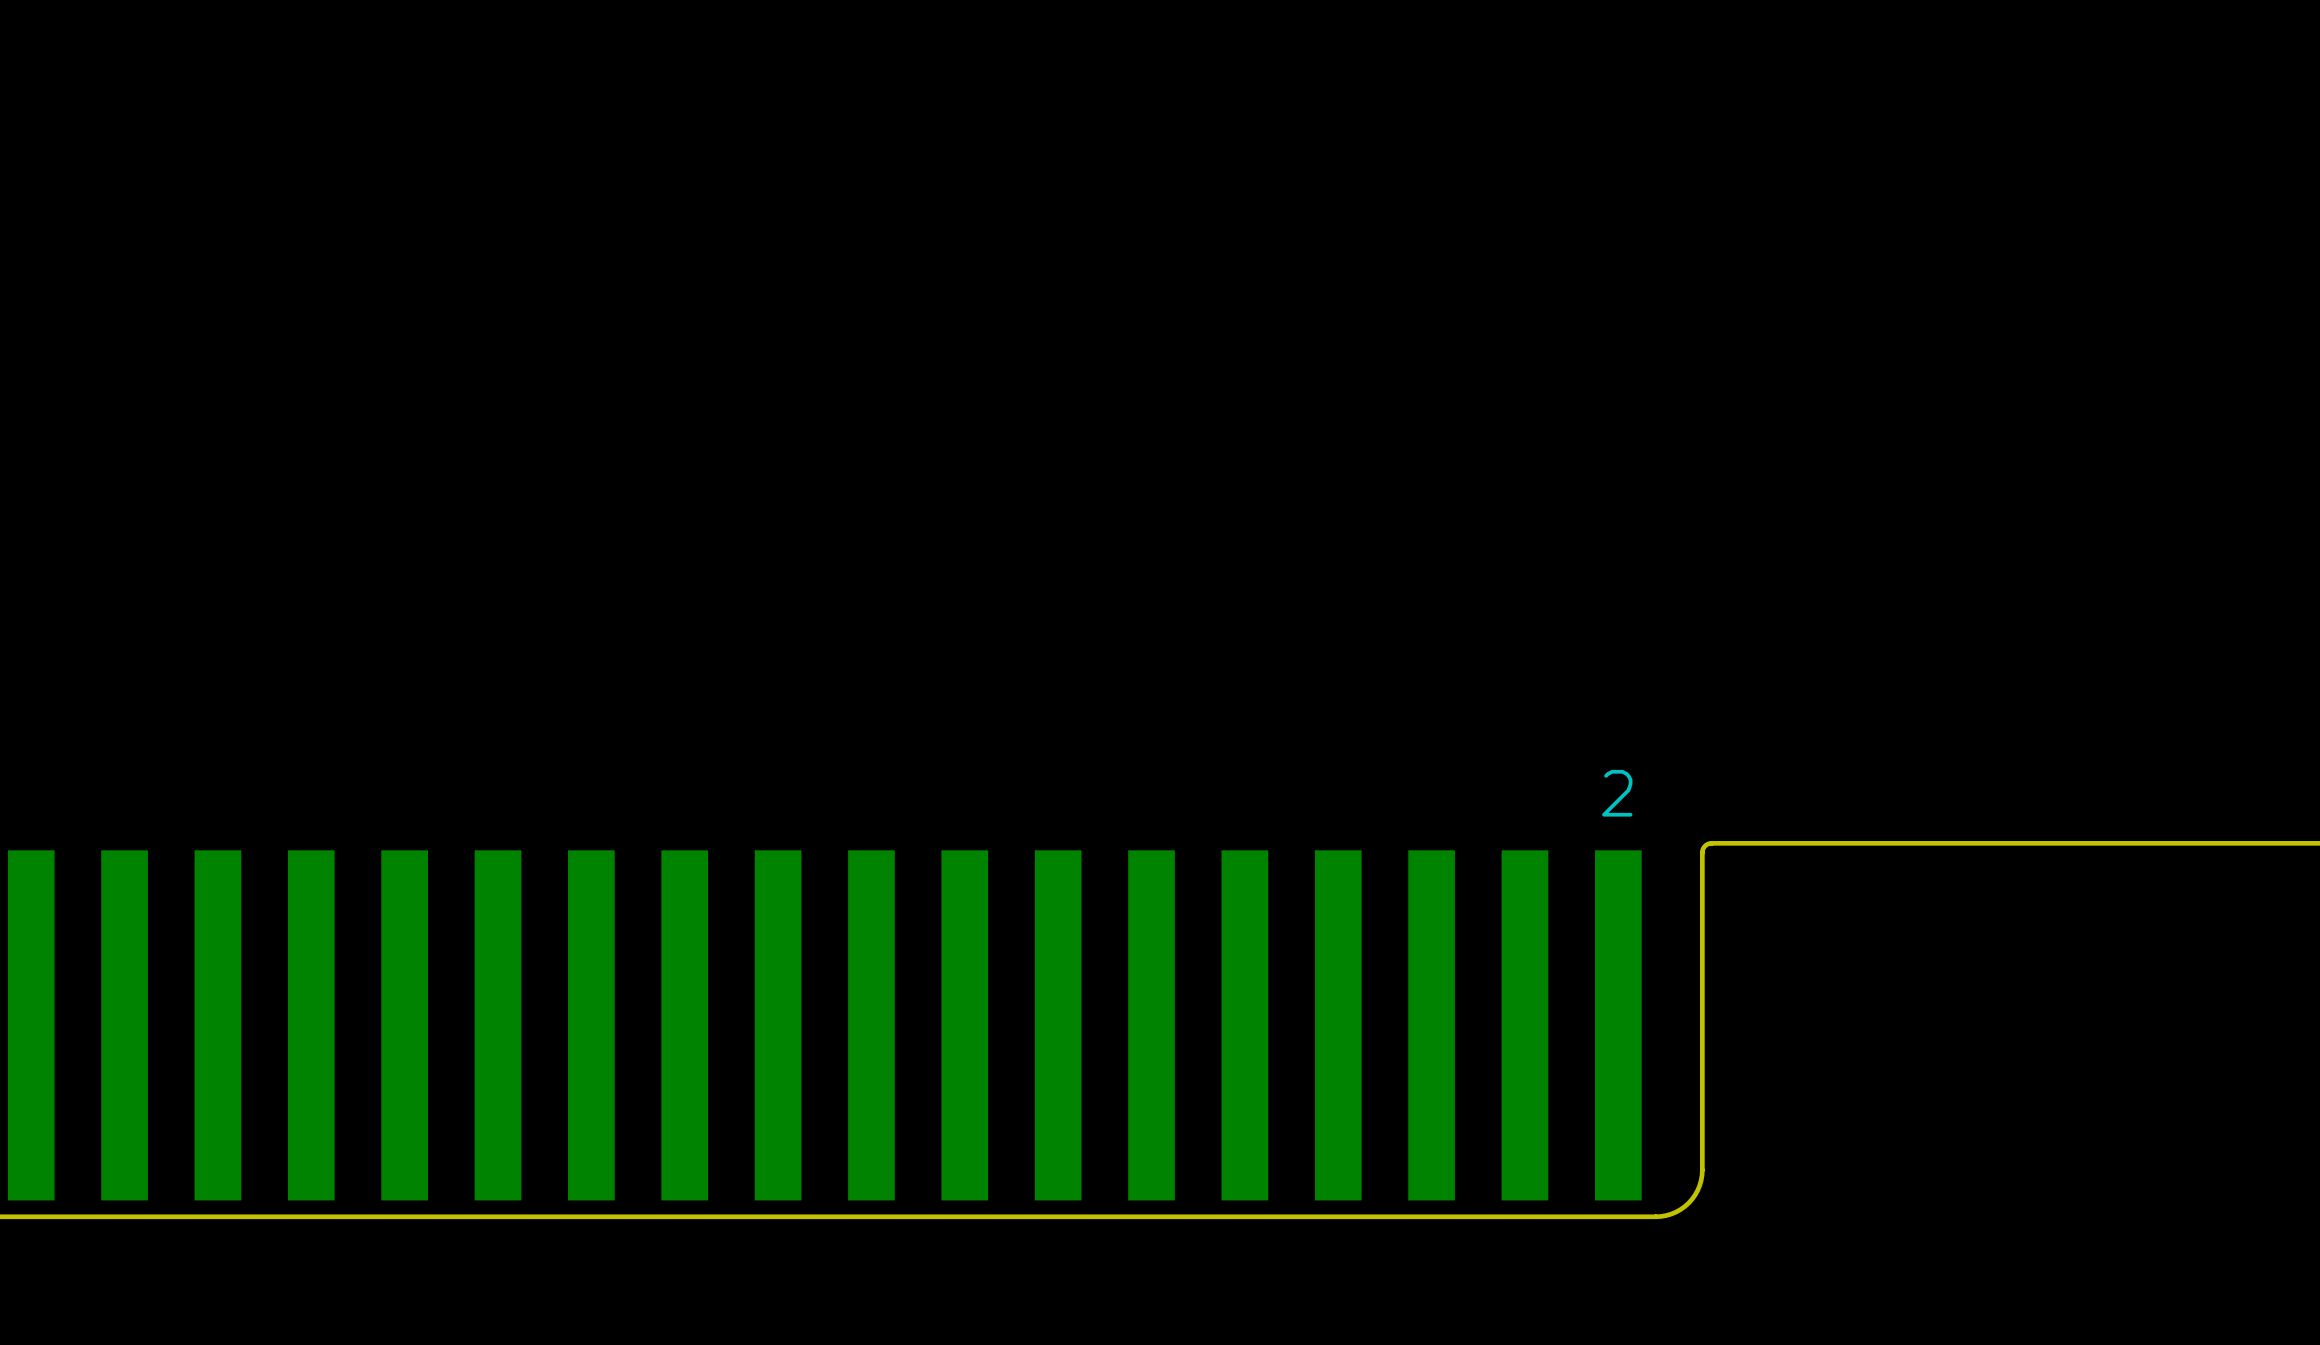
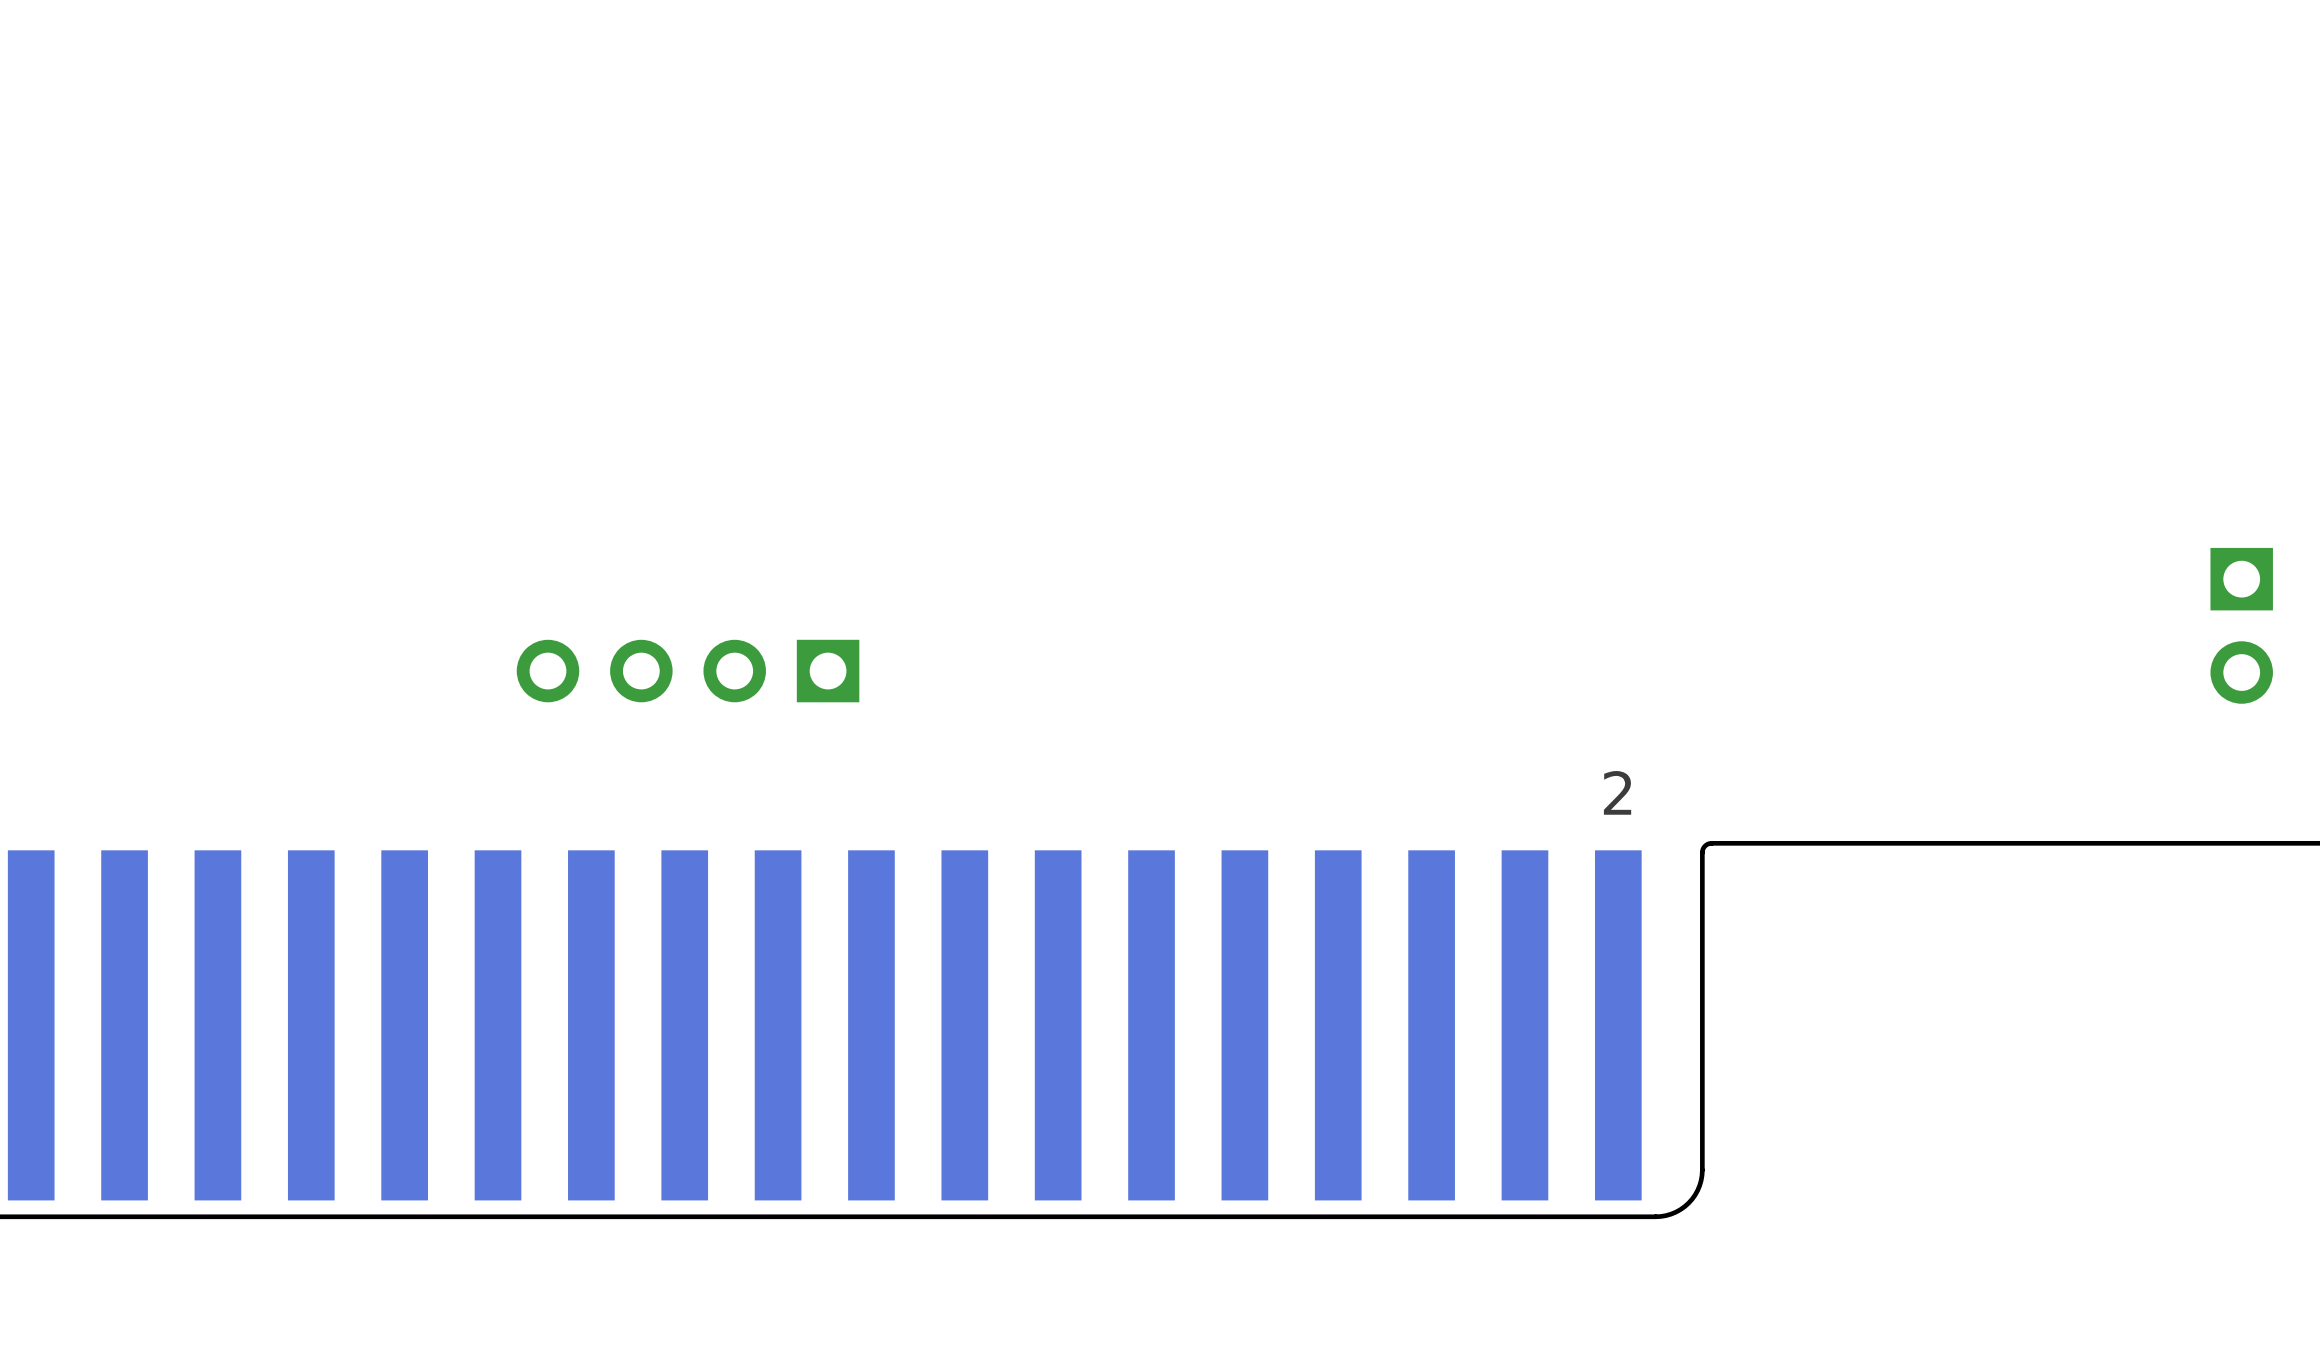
part: none -> (2241, 625)
part: none -> (688, 671)

